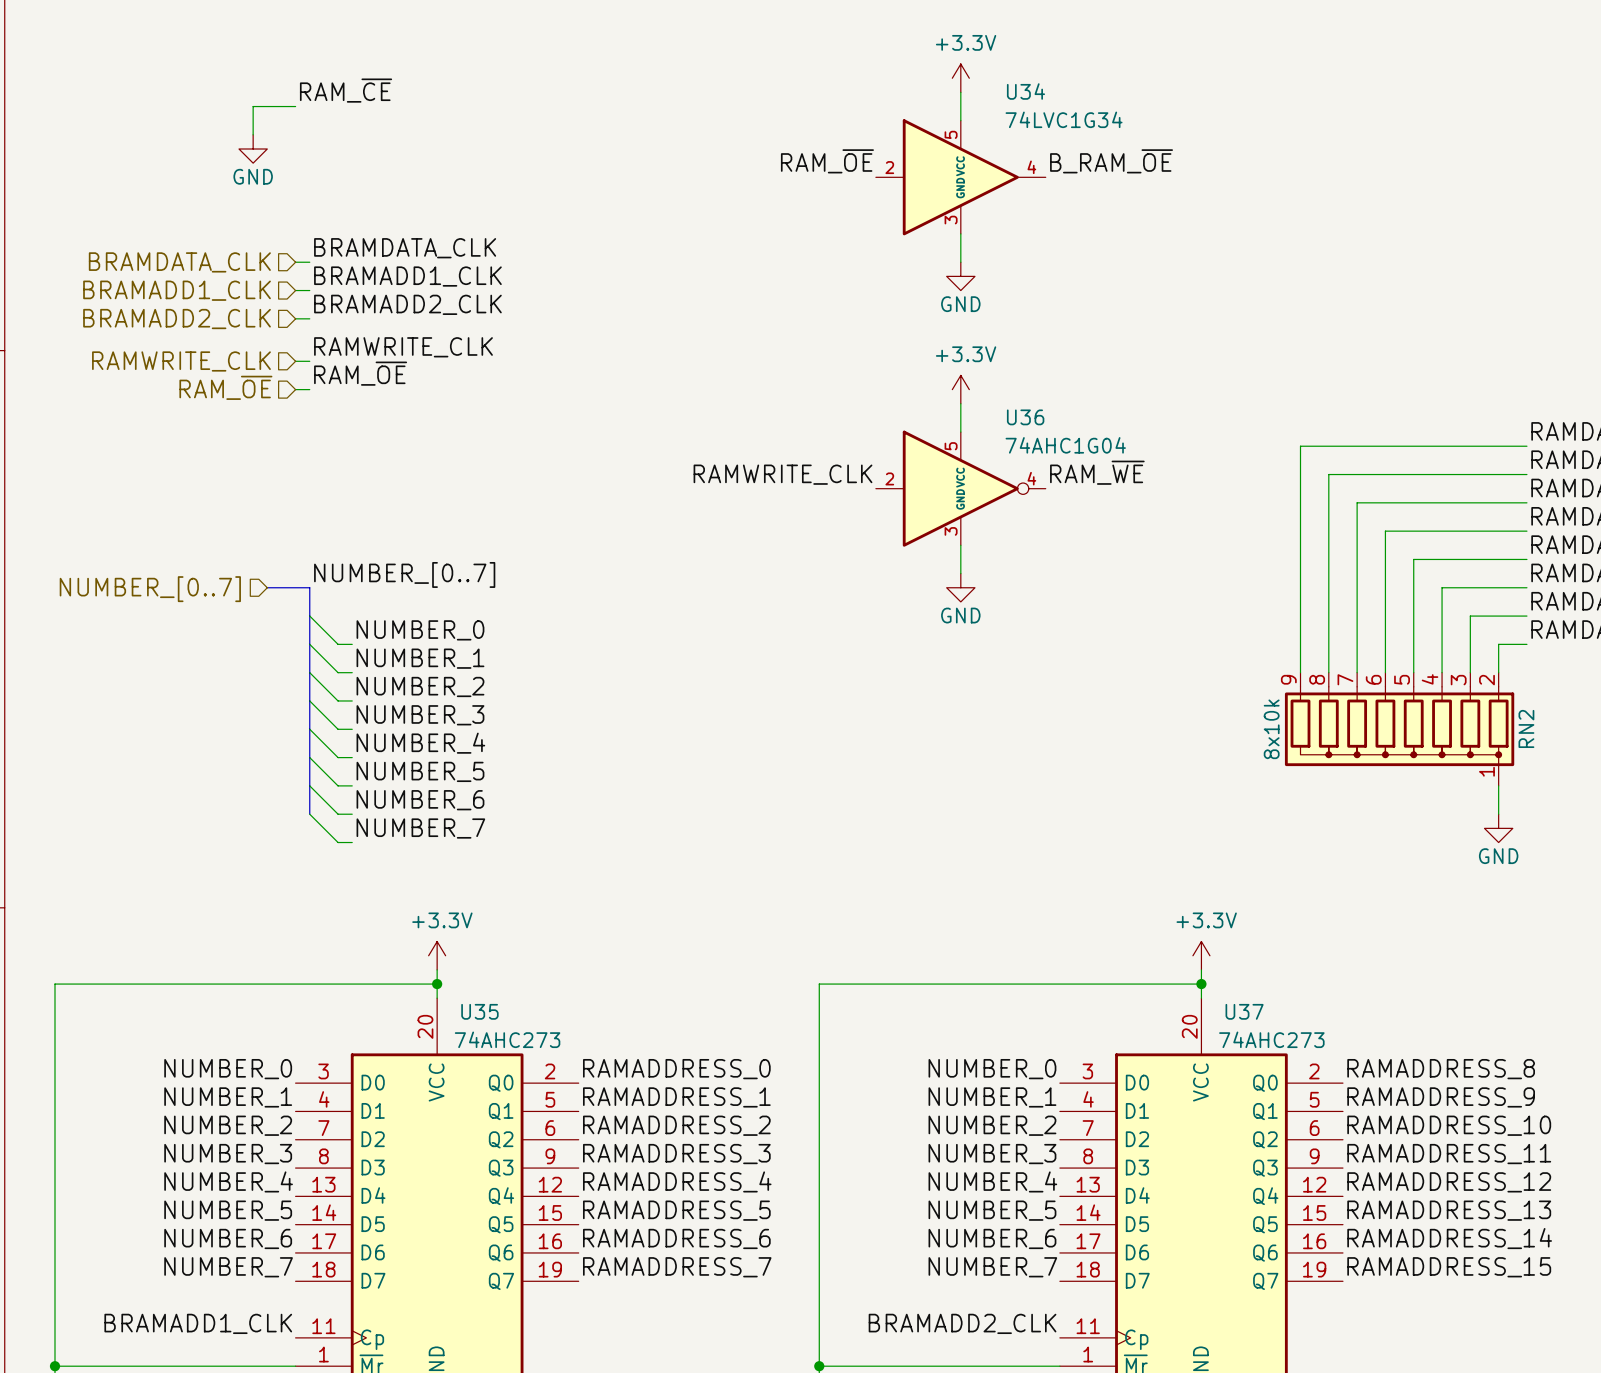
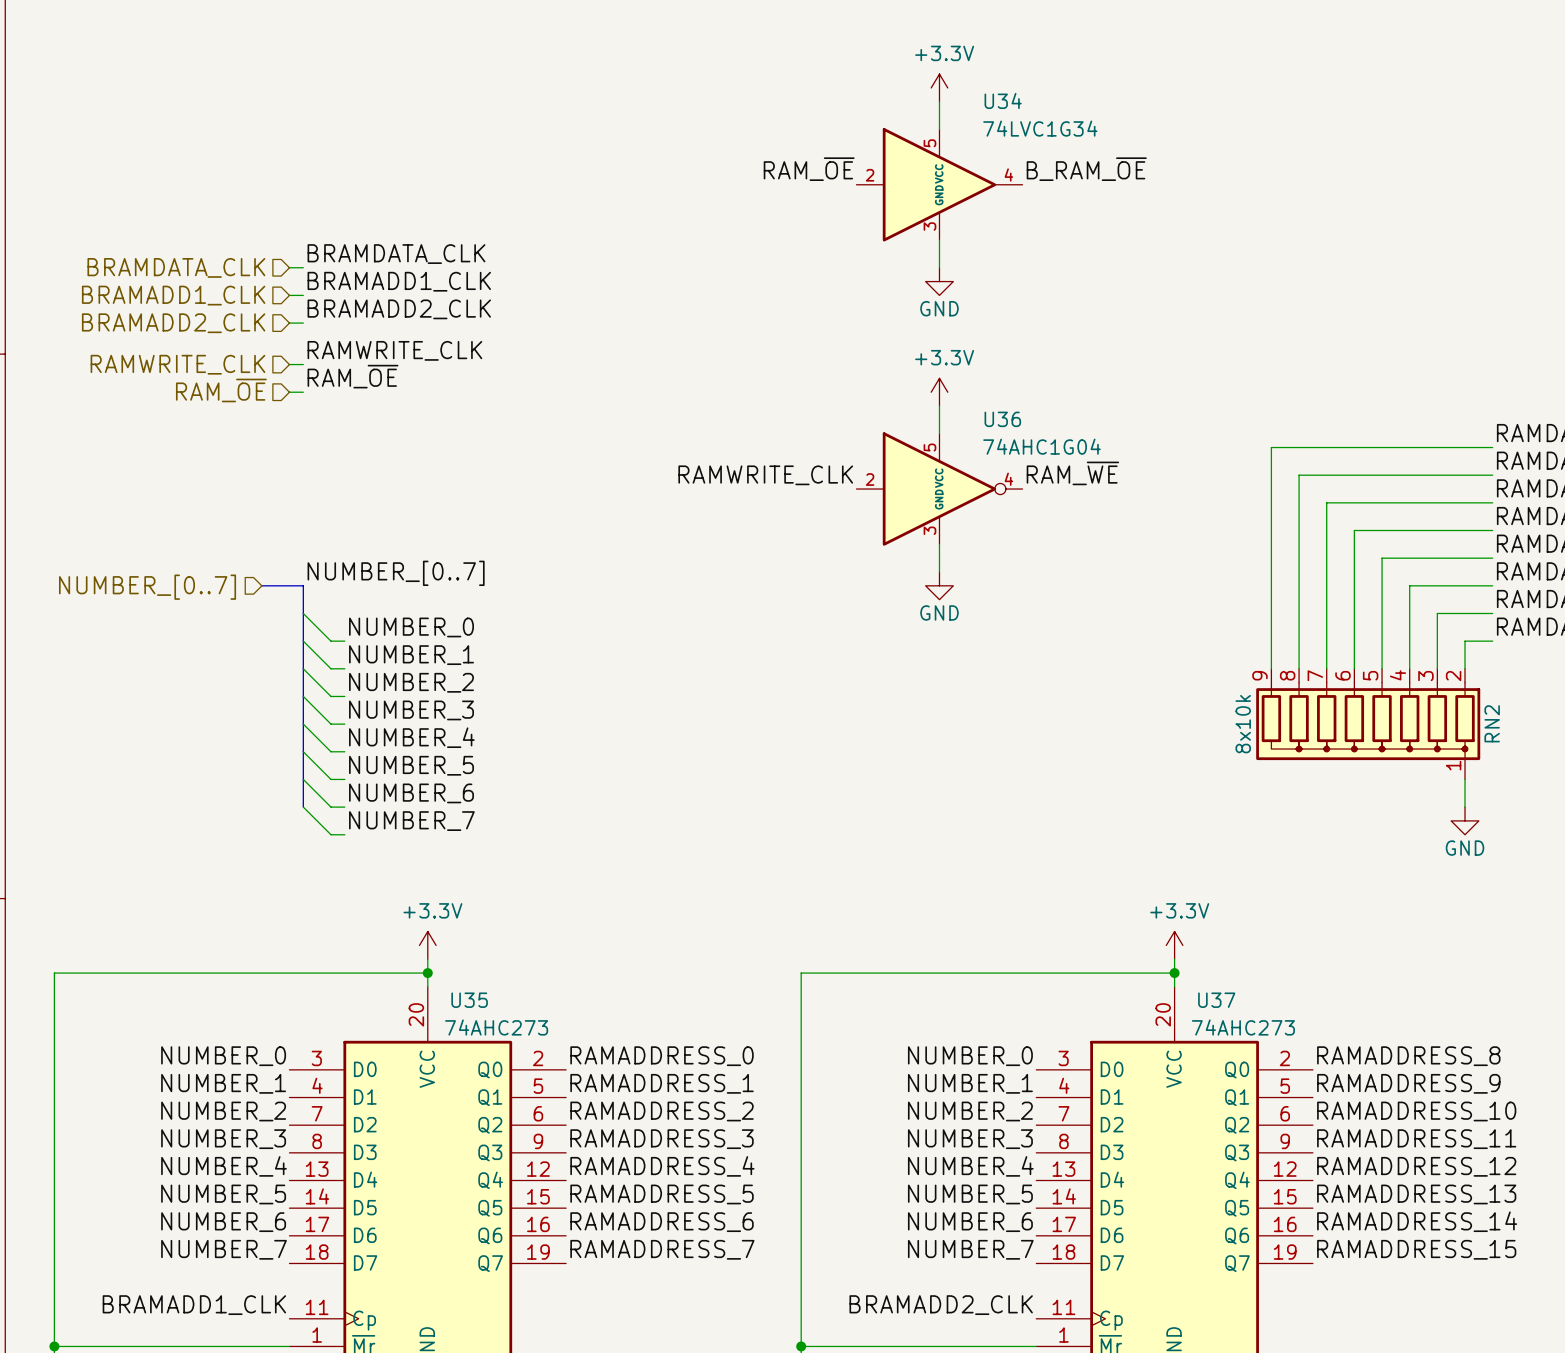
label: RAM_~{CE} (346, 90) -> none
wire: (295, 106) (253, 106) (253, 134) -> none
power symbol: GND (253, 149) -> none

